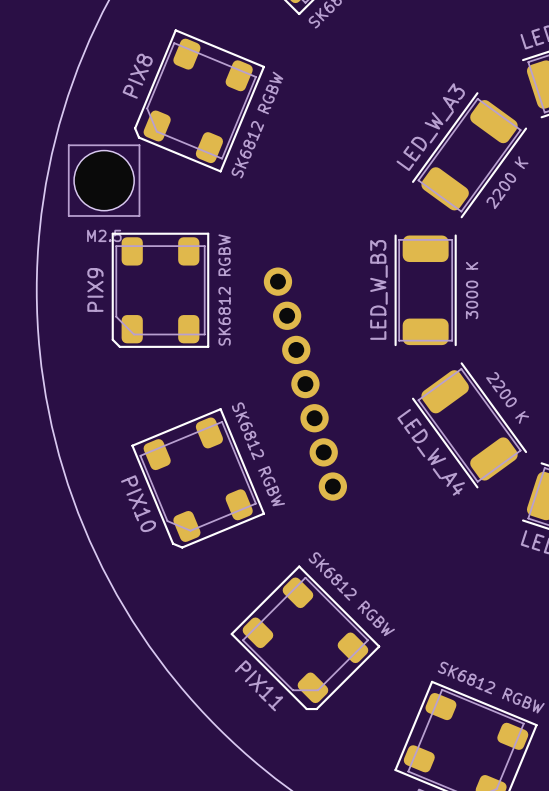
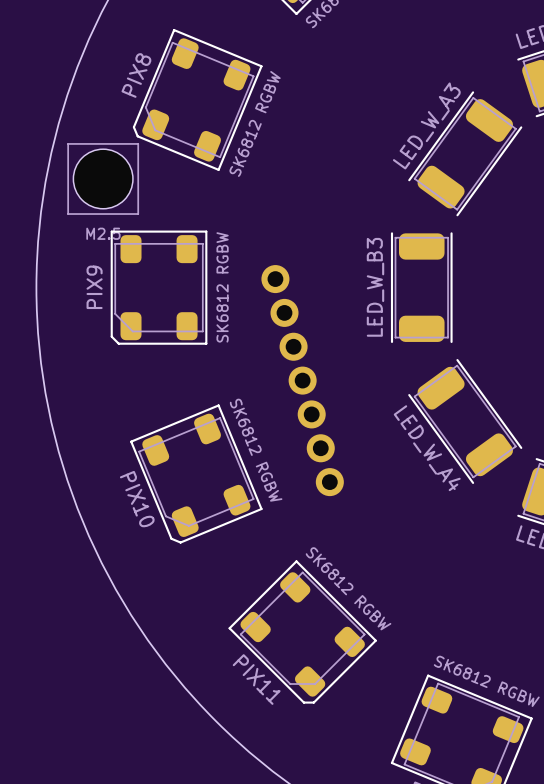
LED_W_A3 value: 2200 K (507, 182) -> none
LED_W_B3 value: 3000 K (472, 290) -> none
LED_W_A4 value: 2200 K (507, 397) -> none

